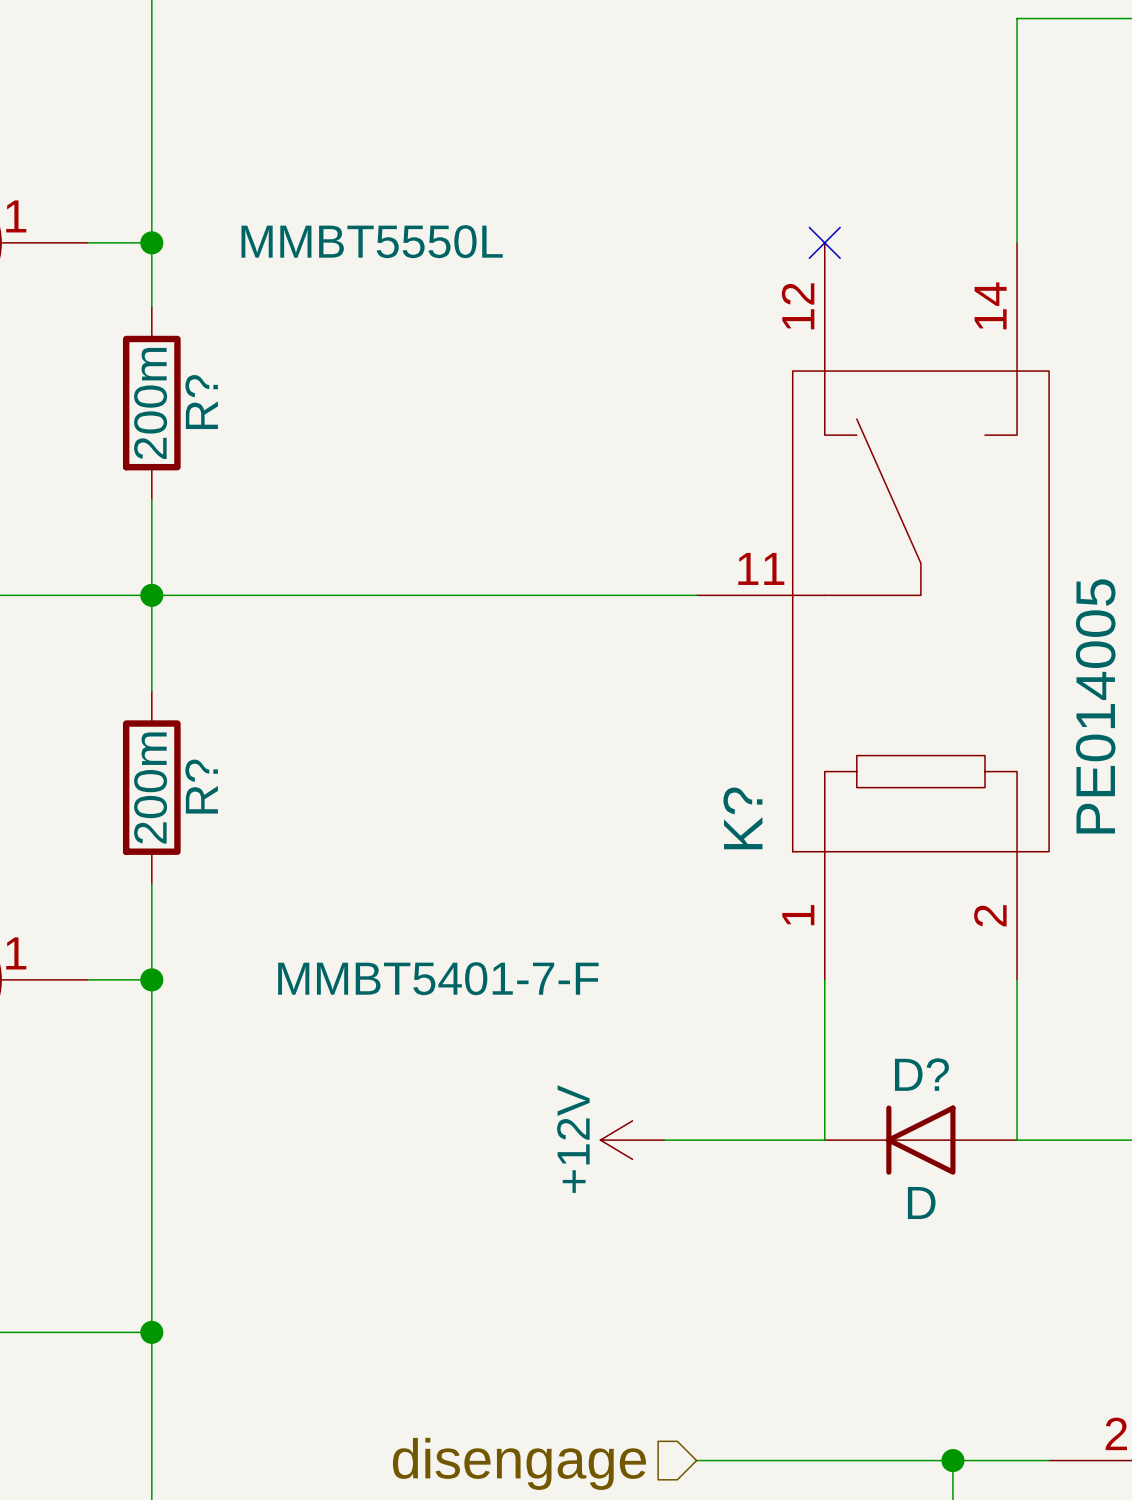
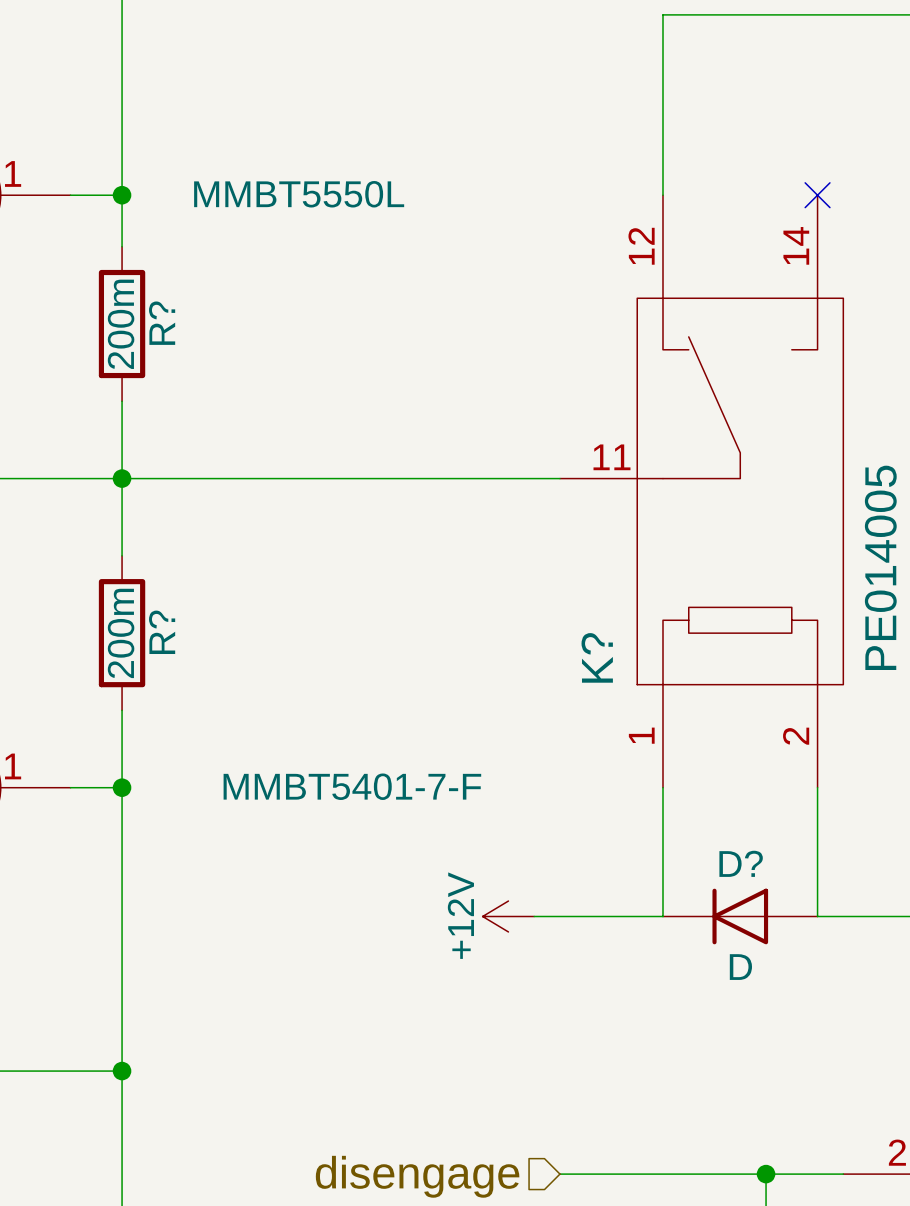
wire: (1017, 18) (1017, 242) -> (817, 14) (663, 14) (663, 195)
no-connect mark: (824, 242) -> none
no-connect mark: none -> (817, 195)

